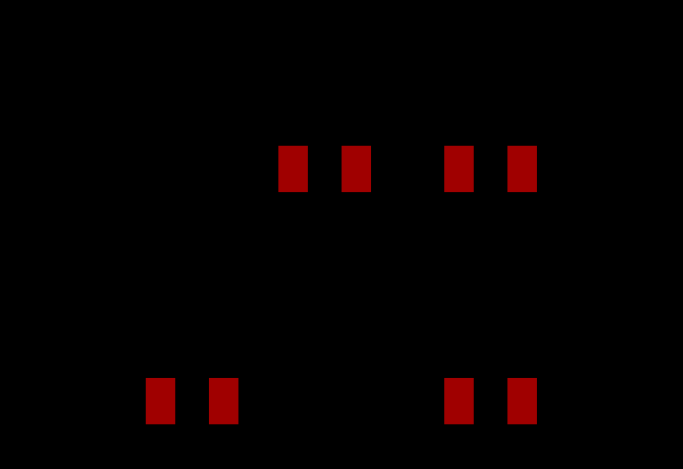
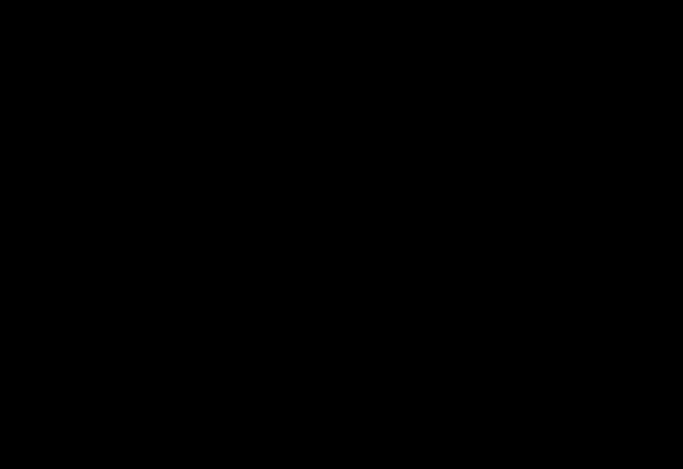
part: (324, 168) -> none
part: (490, 168) -> none
part: (192, 401) -> none
part: (490, 401) -> none

